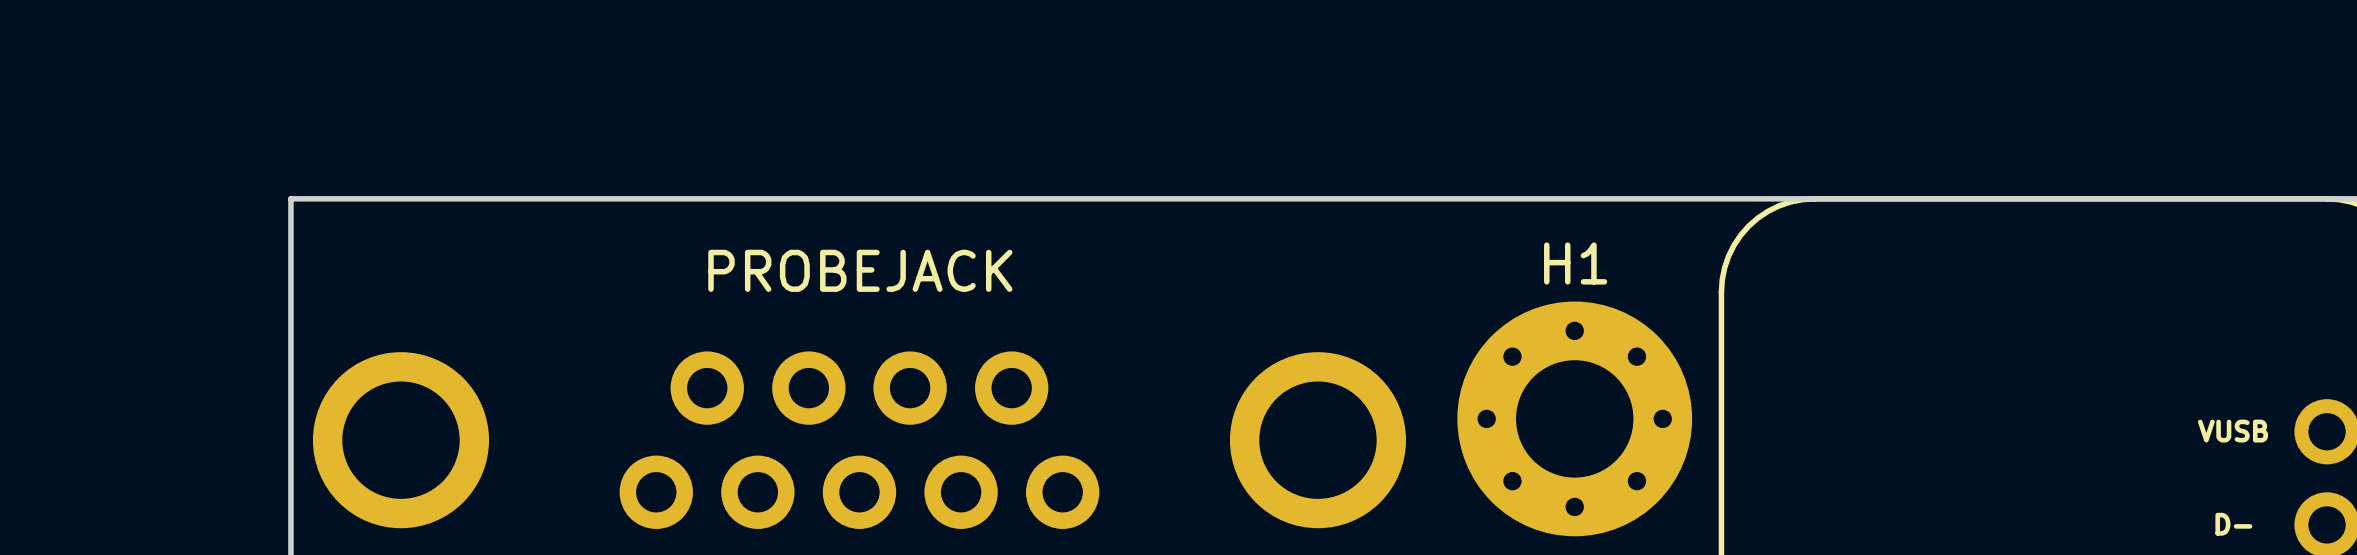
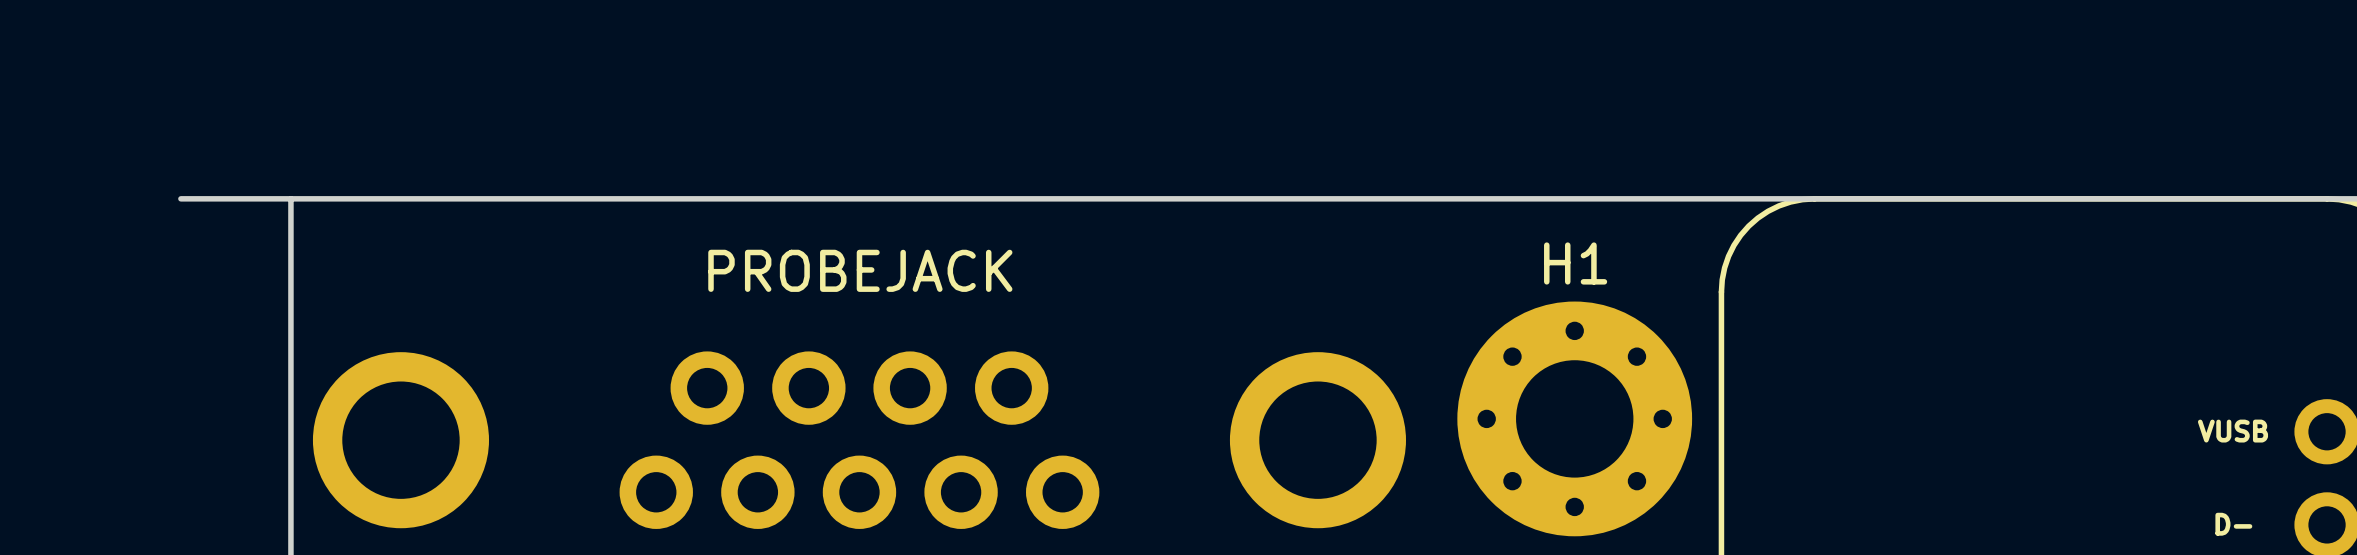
board edge: none -> (180, 198) (290, 198)

